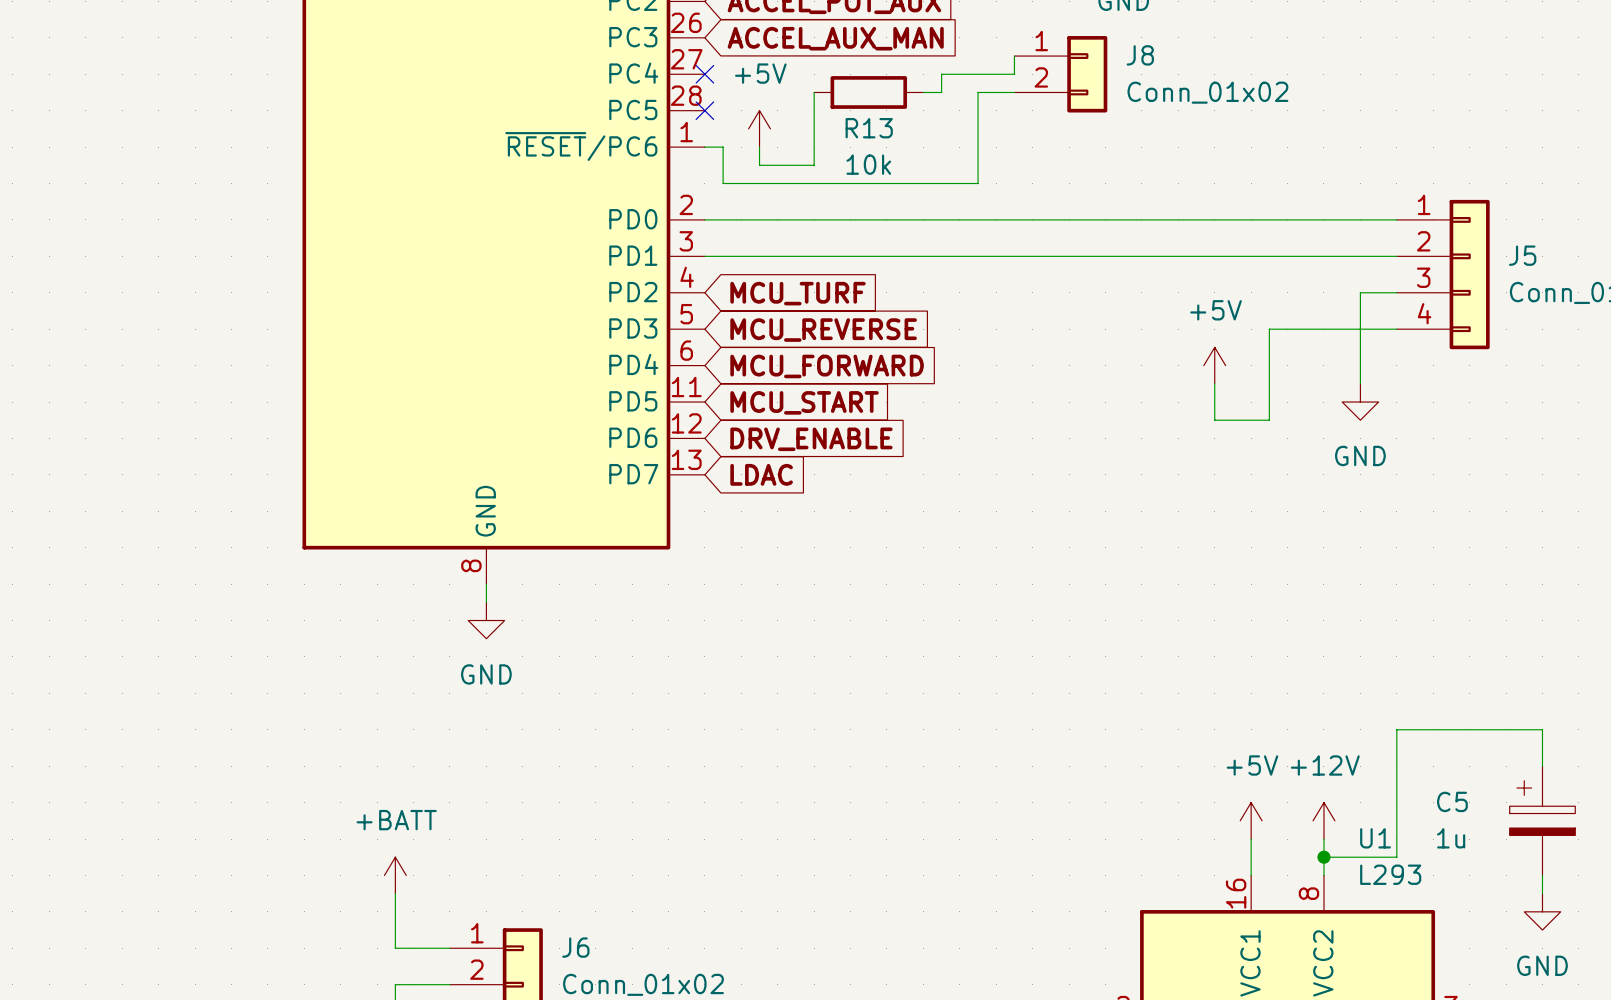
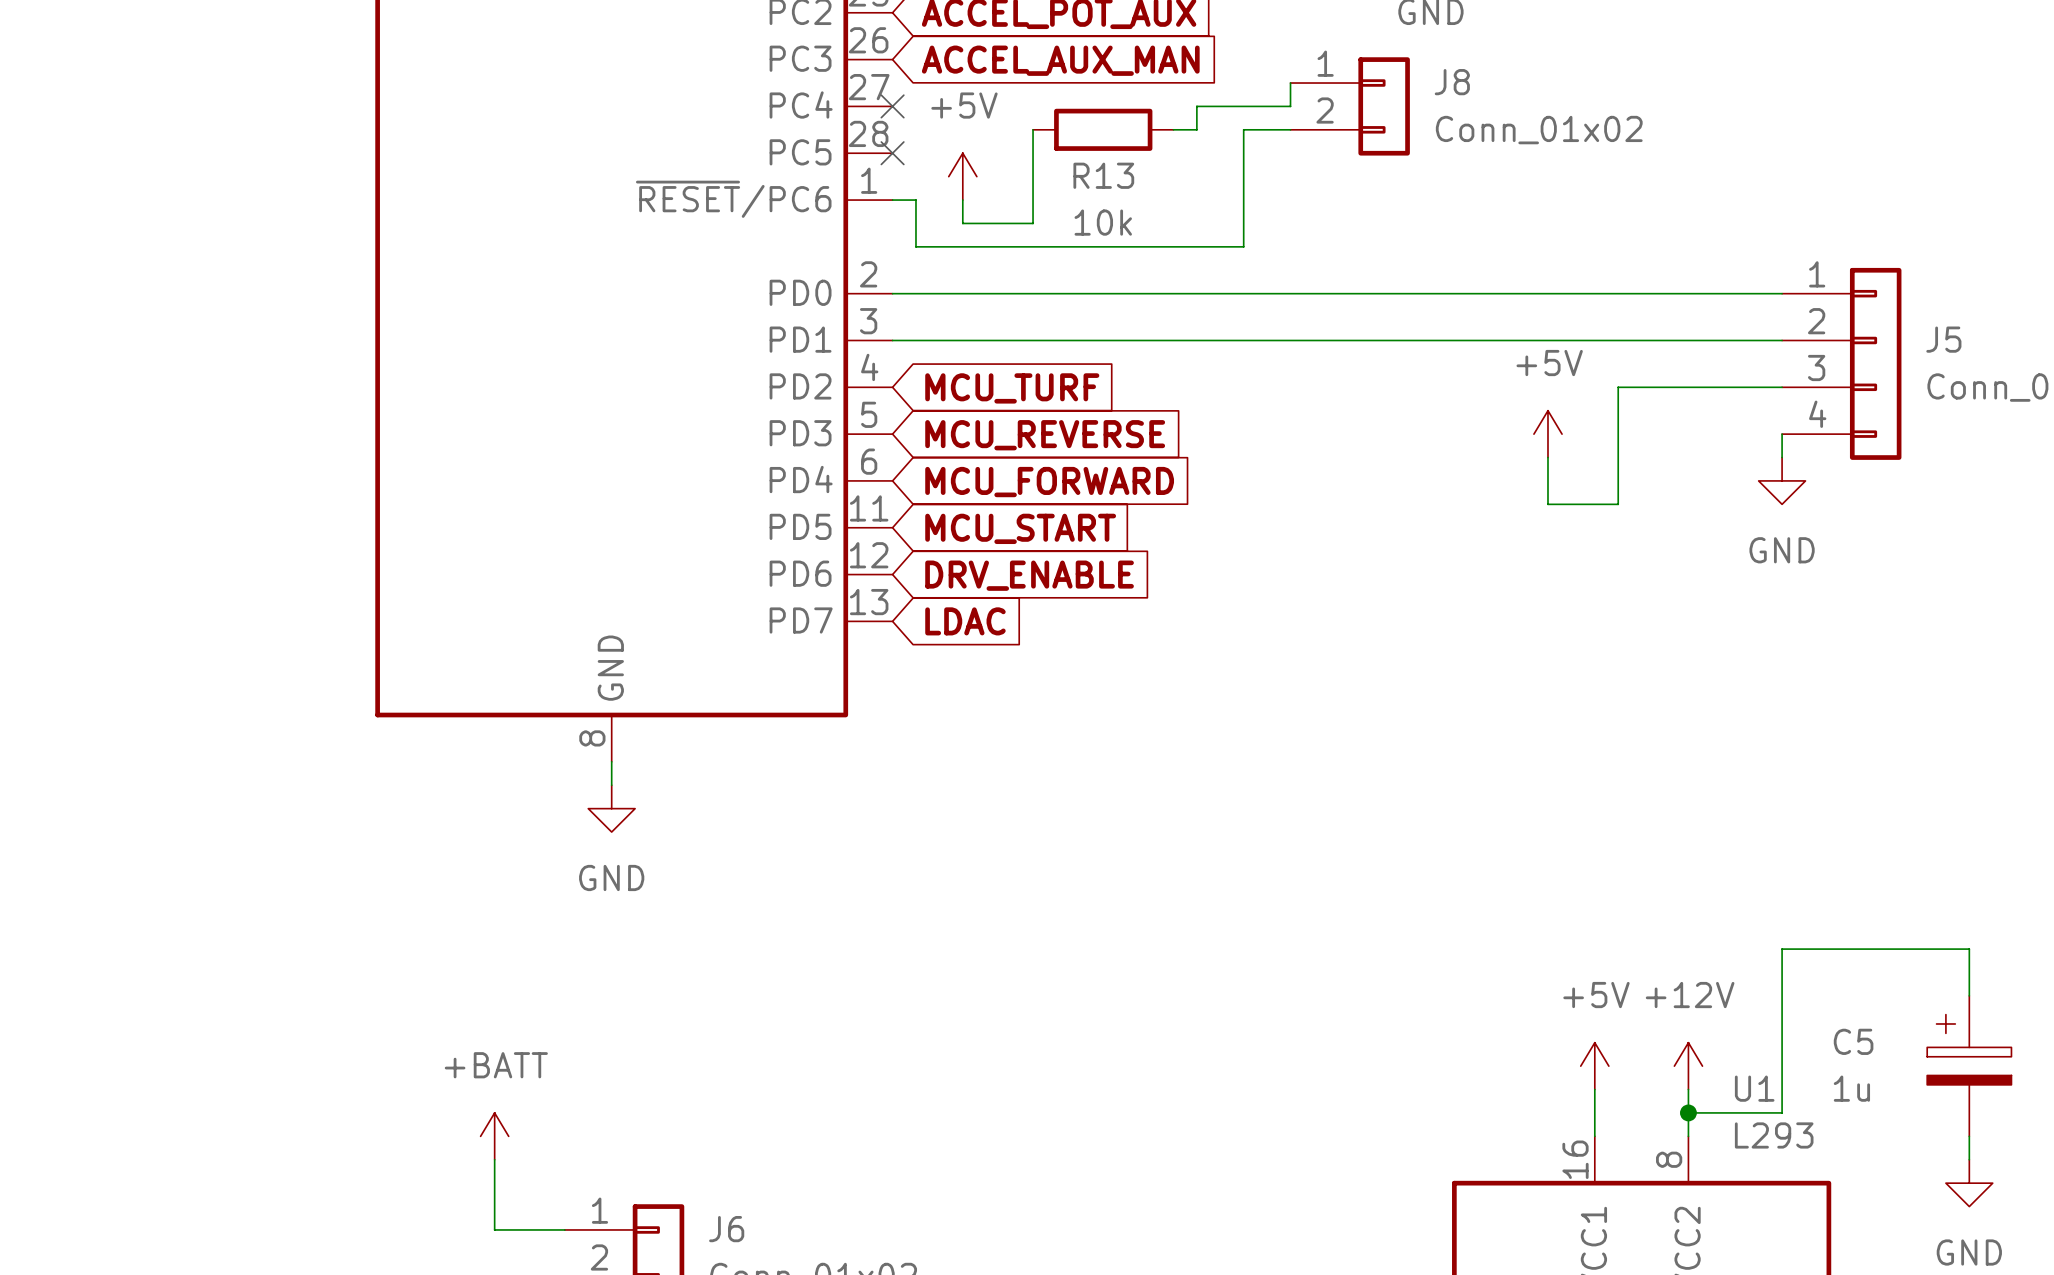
wire: (1360, 292) (1360, 383) -> none
wire: (1269, 329) (1396, 329) -> (1618, 434) (1618, 387) (1735, 387)
wire: none -> (1782, 434) (1782, 457)
power symbol position: +5V (1214, 365) -> +5V (1547, 434)
wire: (1214, 383) (1214, 420) (1269, 420) (1269, 383) -> (1547, 457) (1547, 504) (1618, 504)
power symbol position: GND (1360, 402) -> GND (1782, 480)

